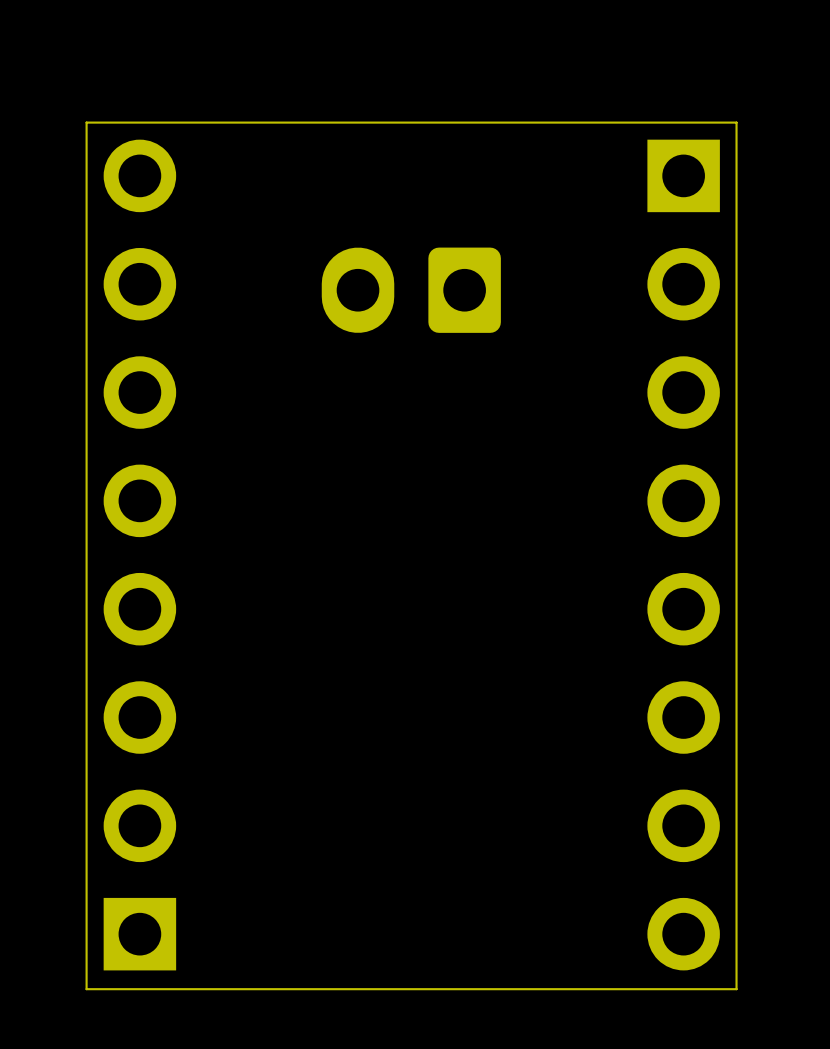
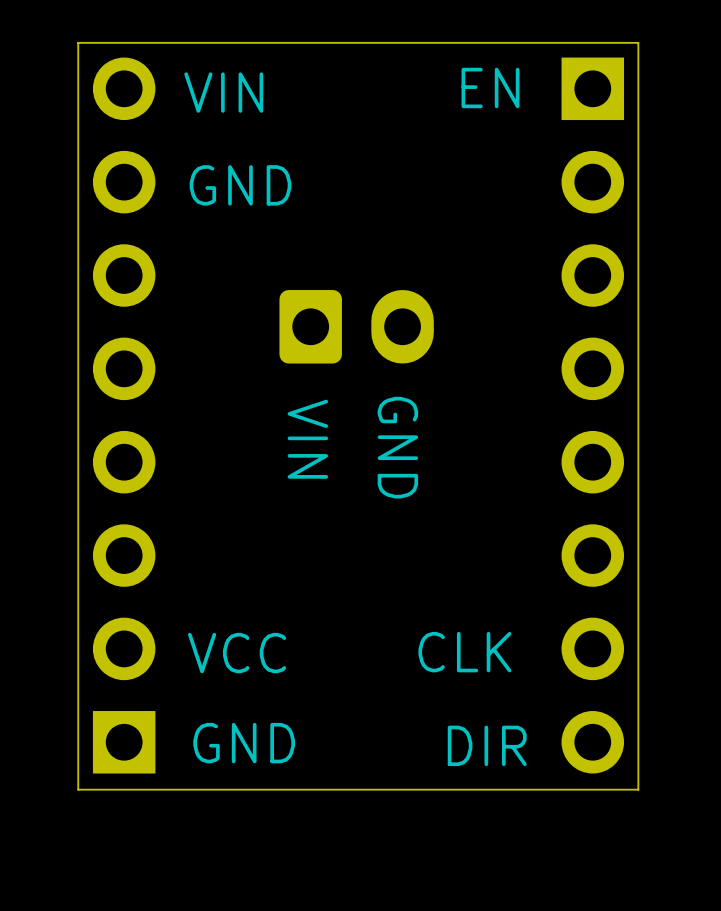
text: none -> EN (490, 87)
text: none -> VIN (223, 92)
text: none -> GND (240, 185)
part rotation: 0° (411, 290) -> 180° (356, 326)
part position: (411, 290) -> (356, 326)
text: none -> VIN (307, 439)
text: none -> GND (397, 447)
text: none -> CLK (464, 652)
text: none -> VCC (237, 653)
text: none -> GND (244, 743)
text: none -> DIR (487, 745)

